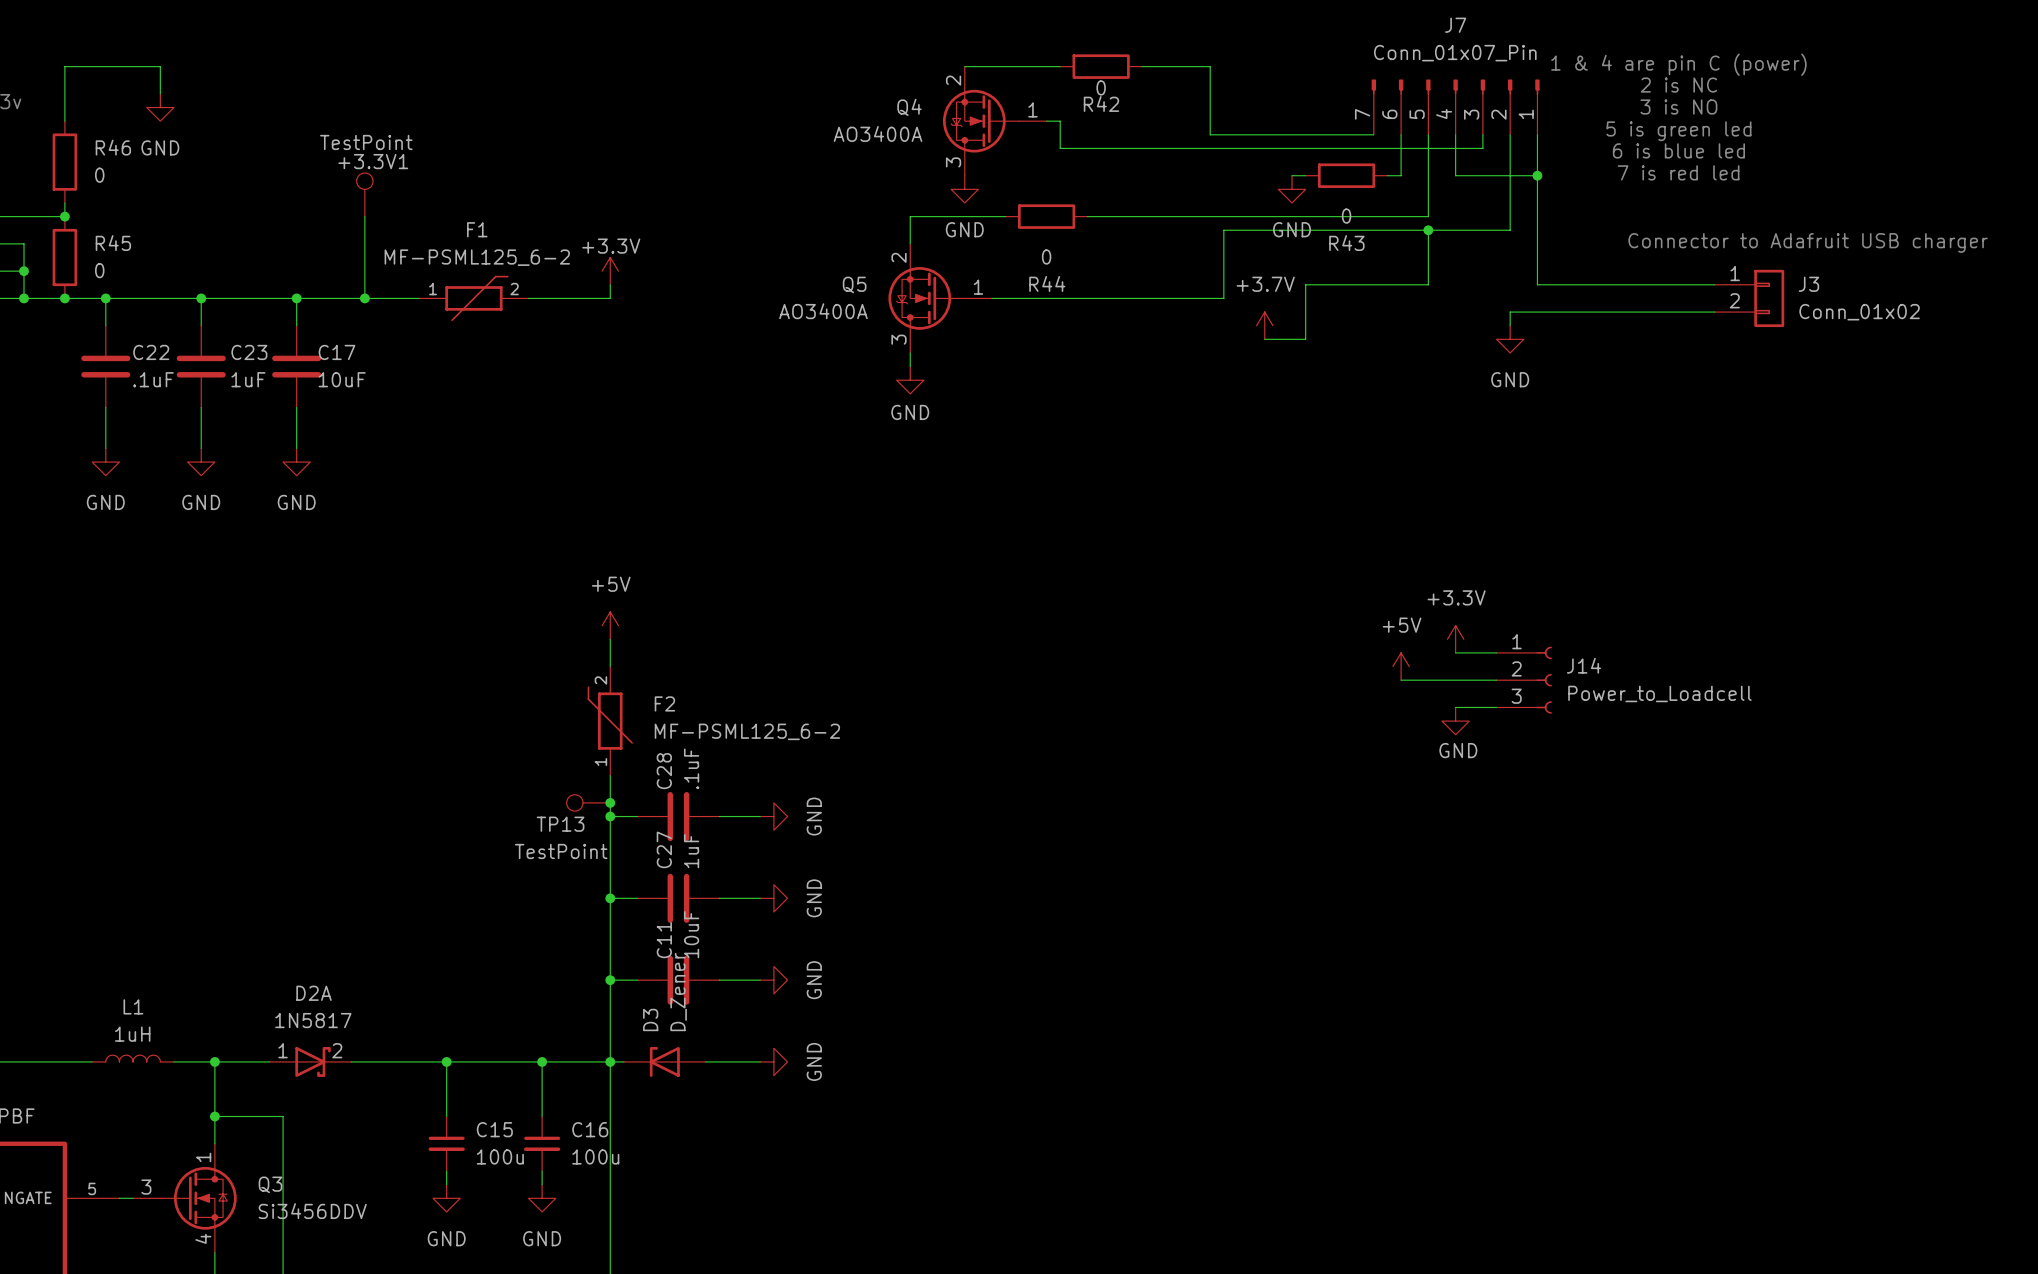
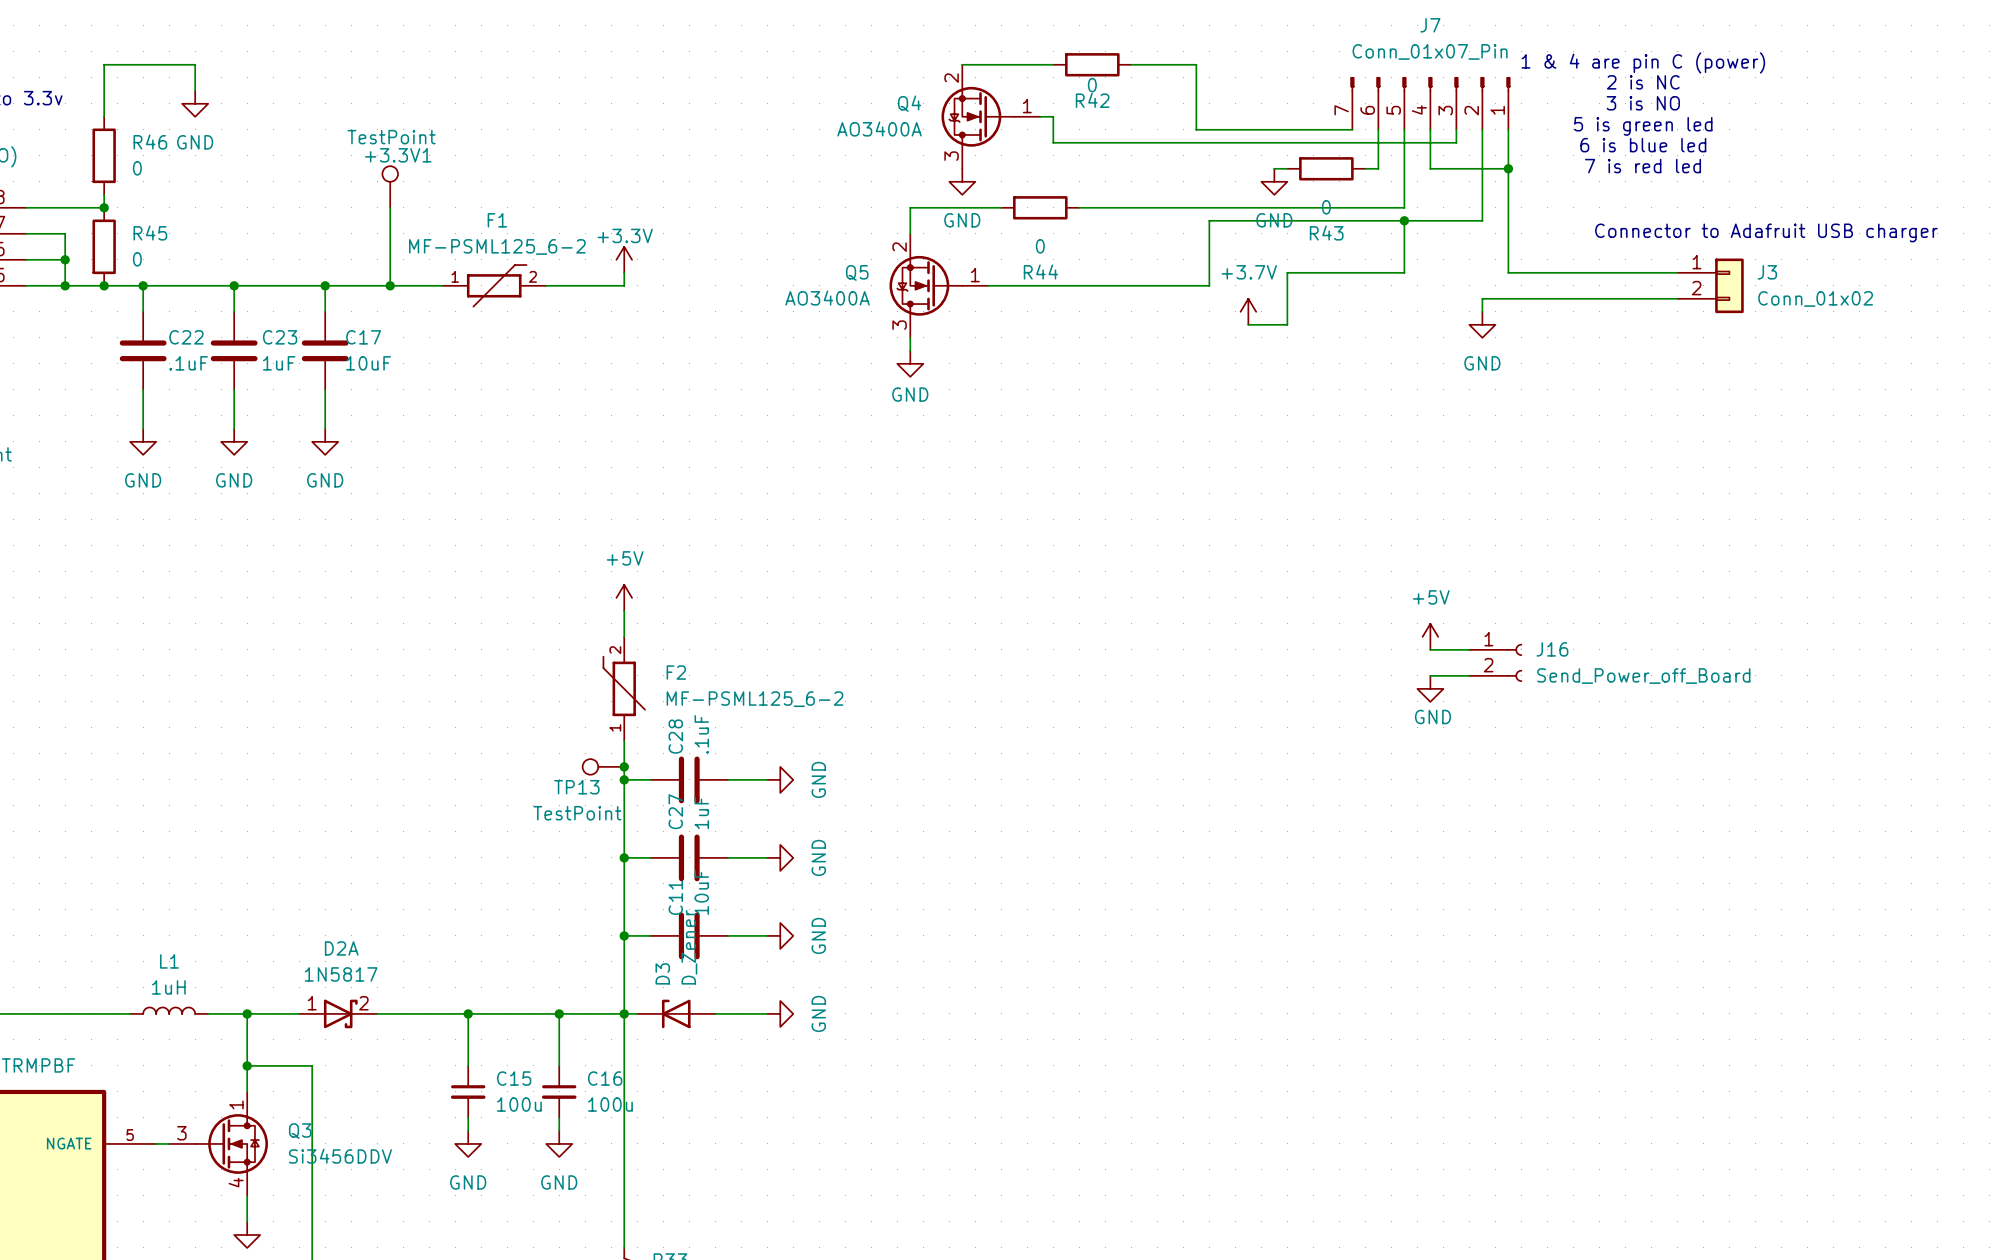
power symbol: +3.3V (1455, 639) -> none
wire: (1455, 652) (1496, 652) -> none
power symbol position: +5V (1401, 666) -> +5V (1430, 636)
wire: (1401, 680) (1455, 680) -> none
J14: Power_to_Loadcell (1524, 680) -> none
J16: none -> Send_Power_off_Board (1495, 662)

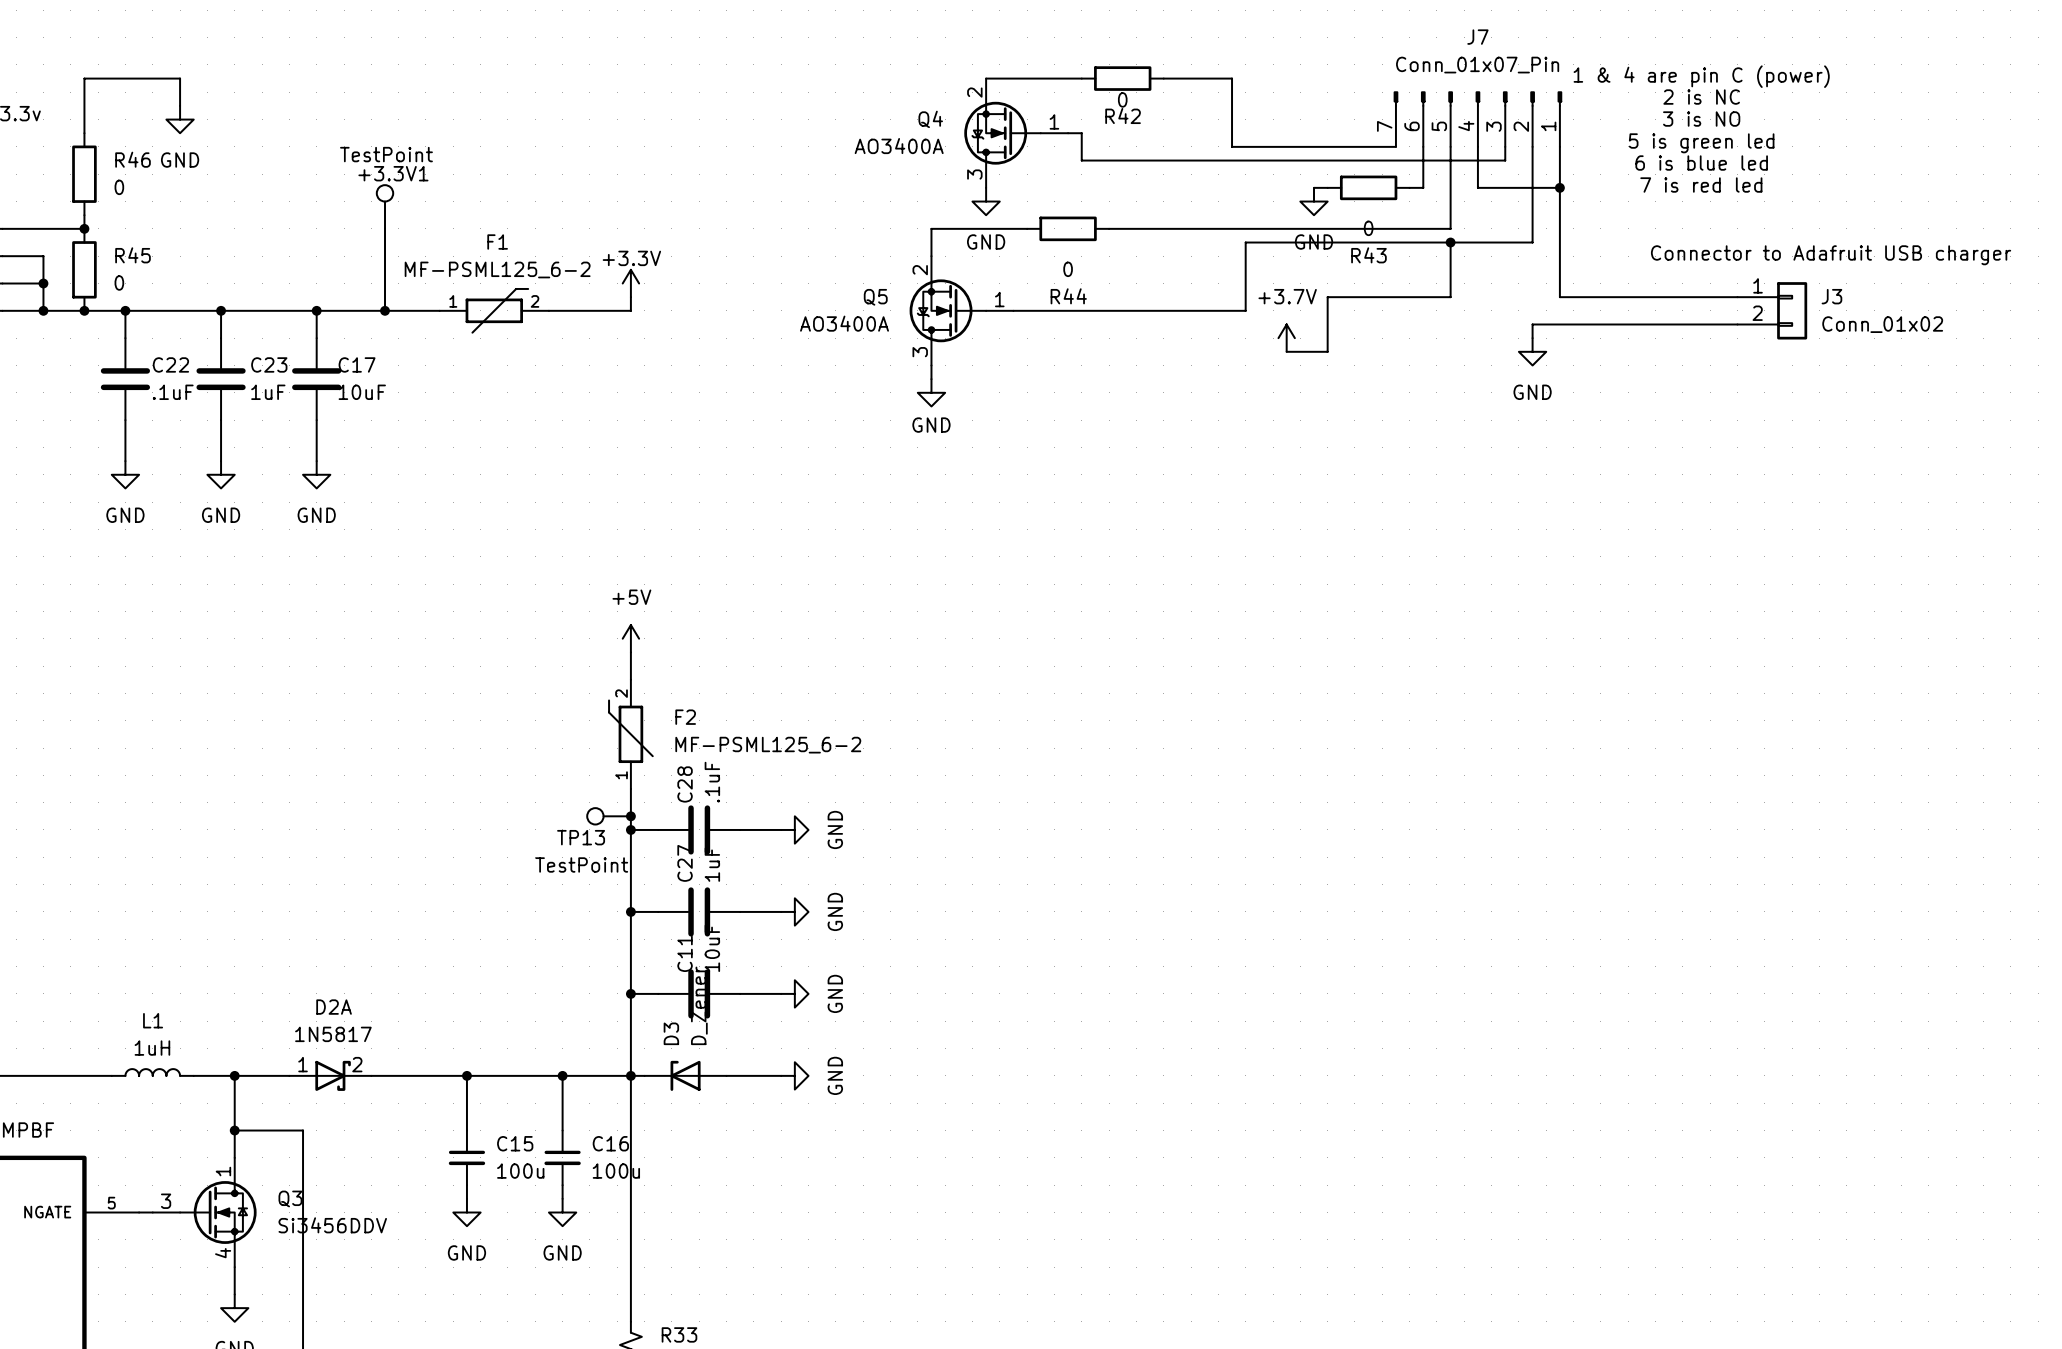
power symbol: +5V (1430, 636) -> none
wire: (1430, 649) (1469, 649) -> none
J16: Send_Power_off_Board (1495, 662) -> none
wire: (1430, 675) (1469, 675) -> none
power symbol: GND (1430, 688) -> none

